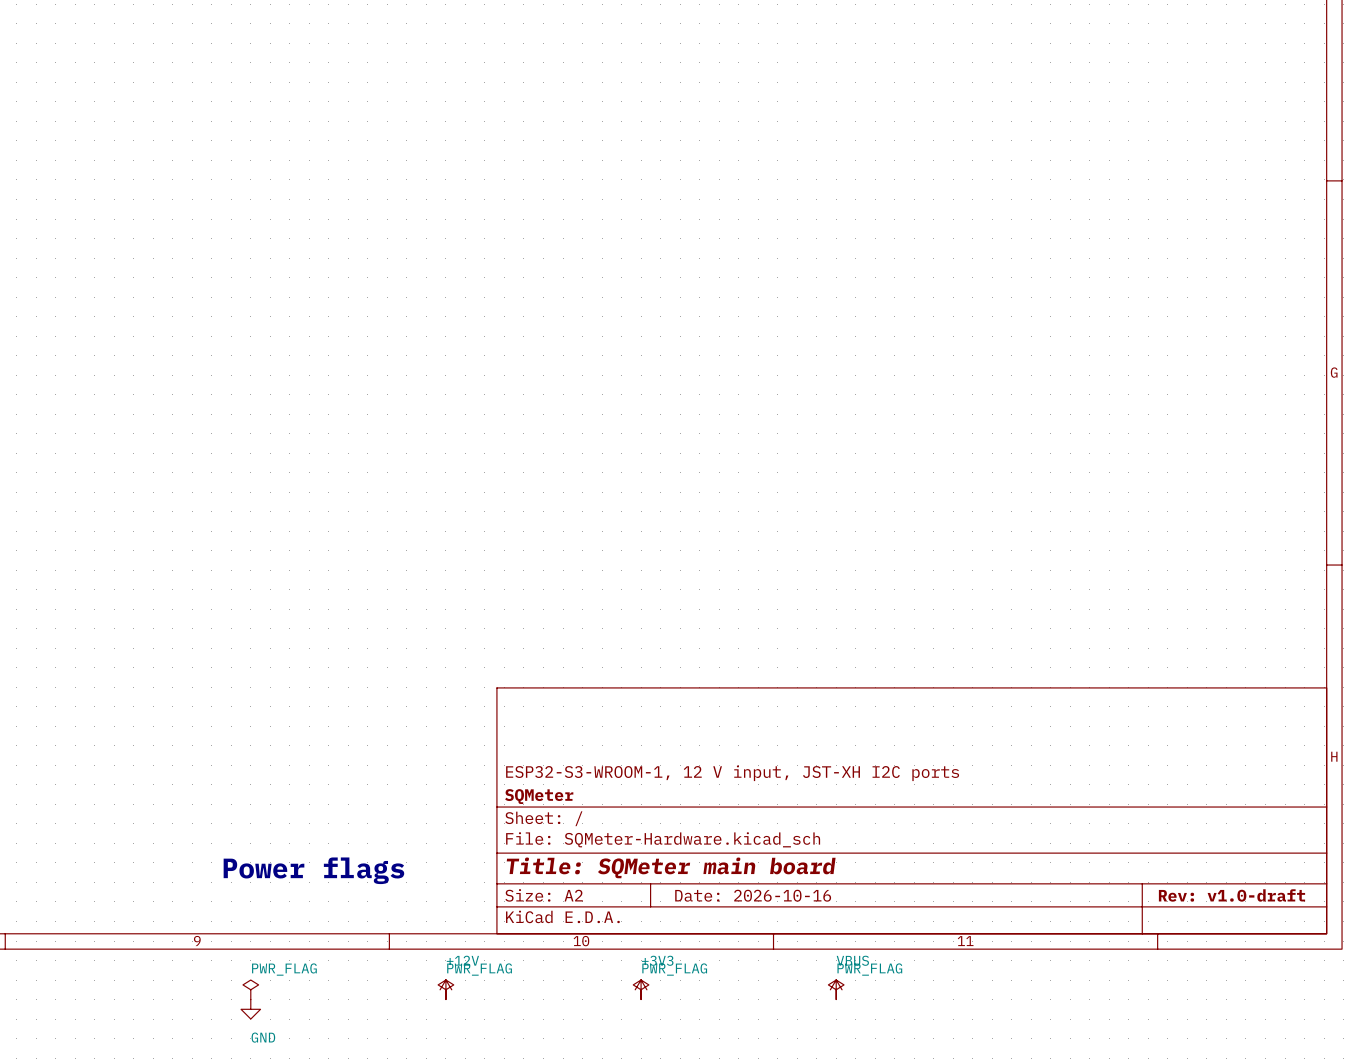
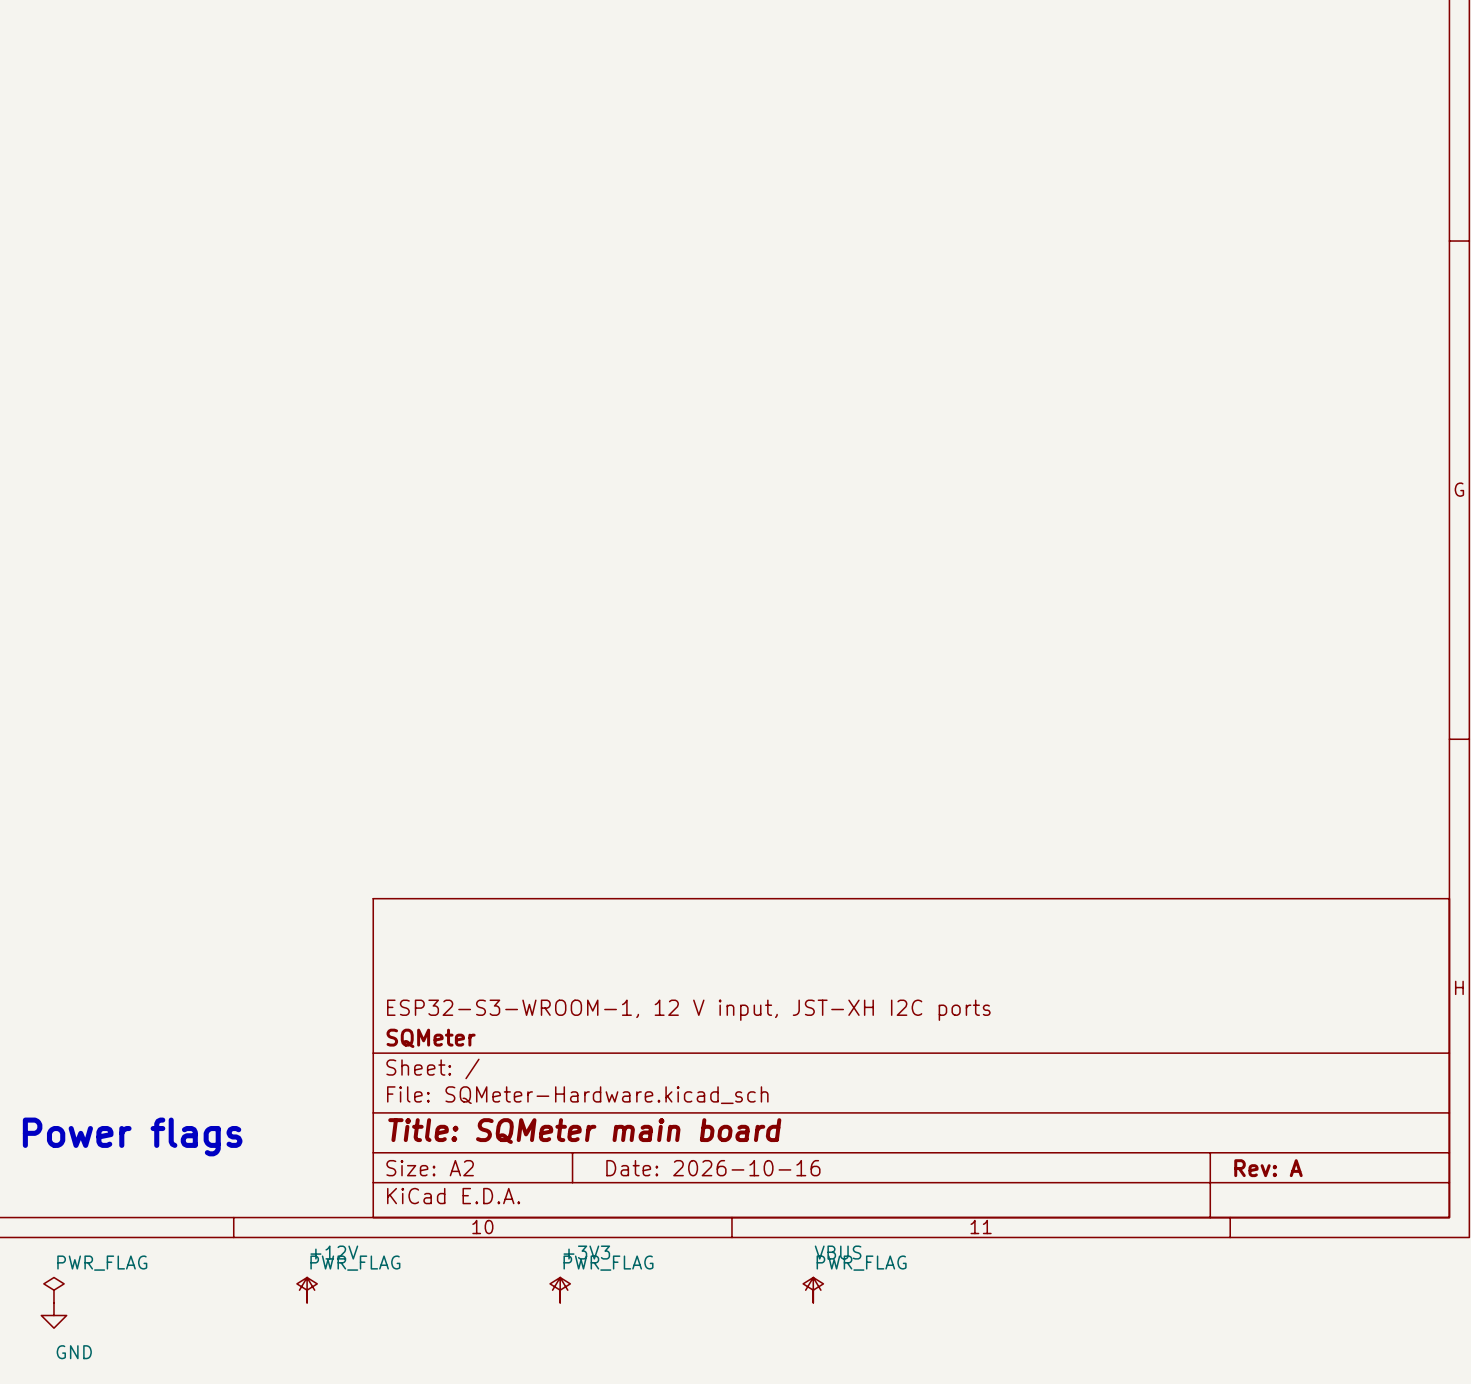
title block: Rev: v1.0-draft (1231, 895) -> Rev: A (1268, 1168)

